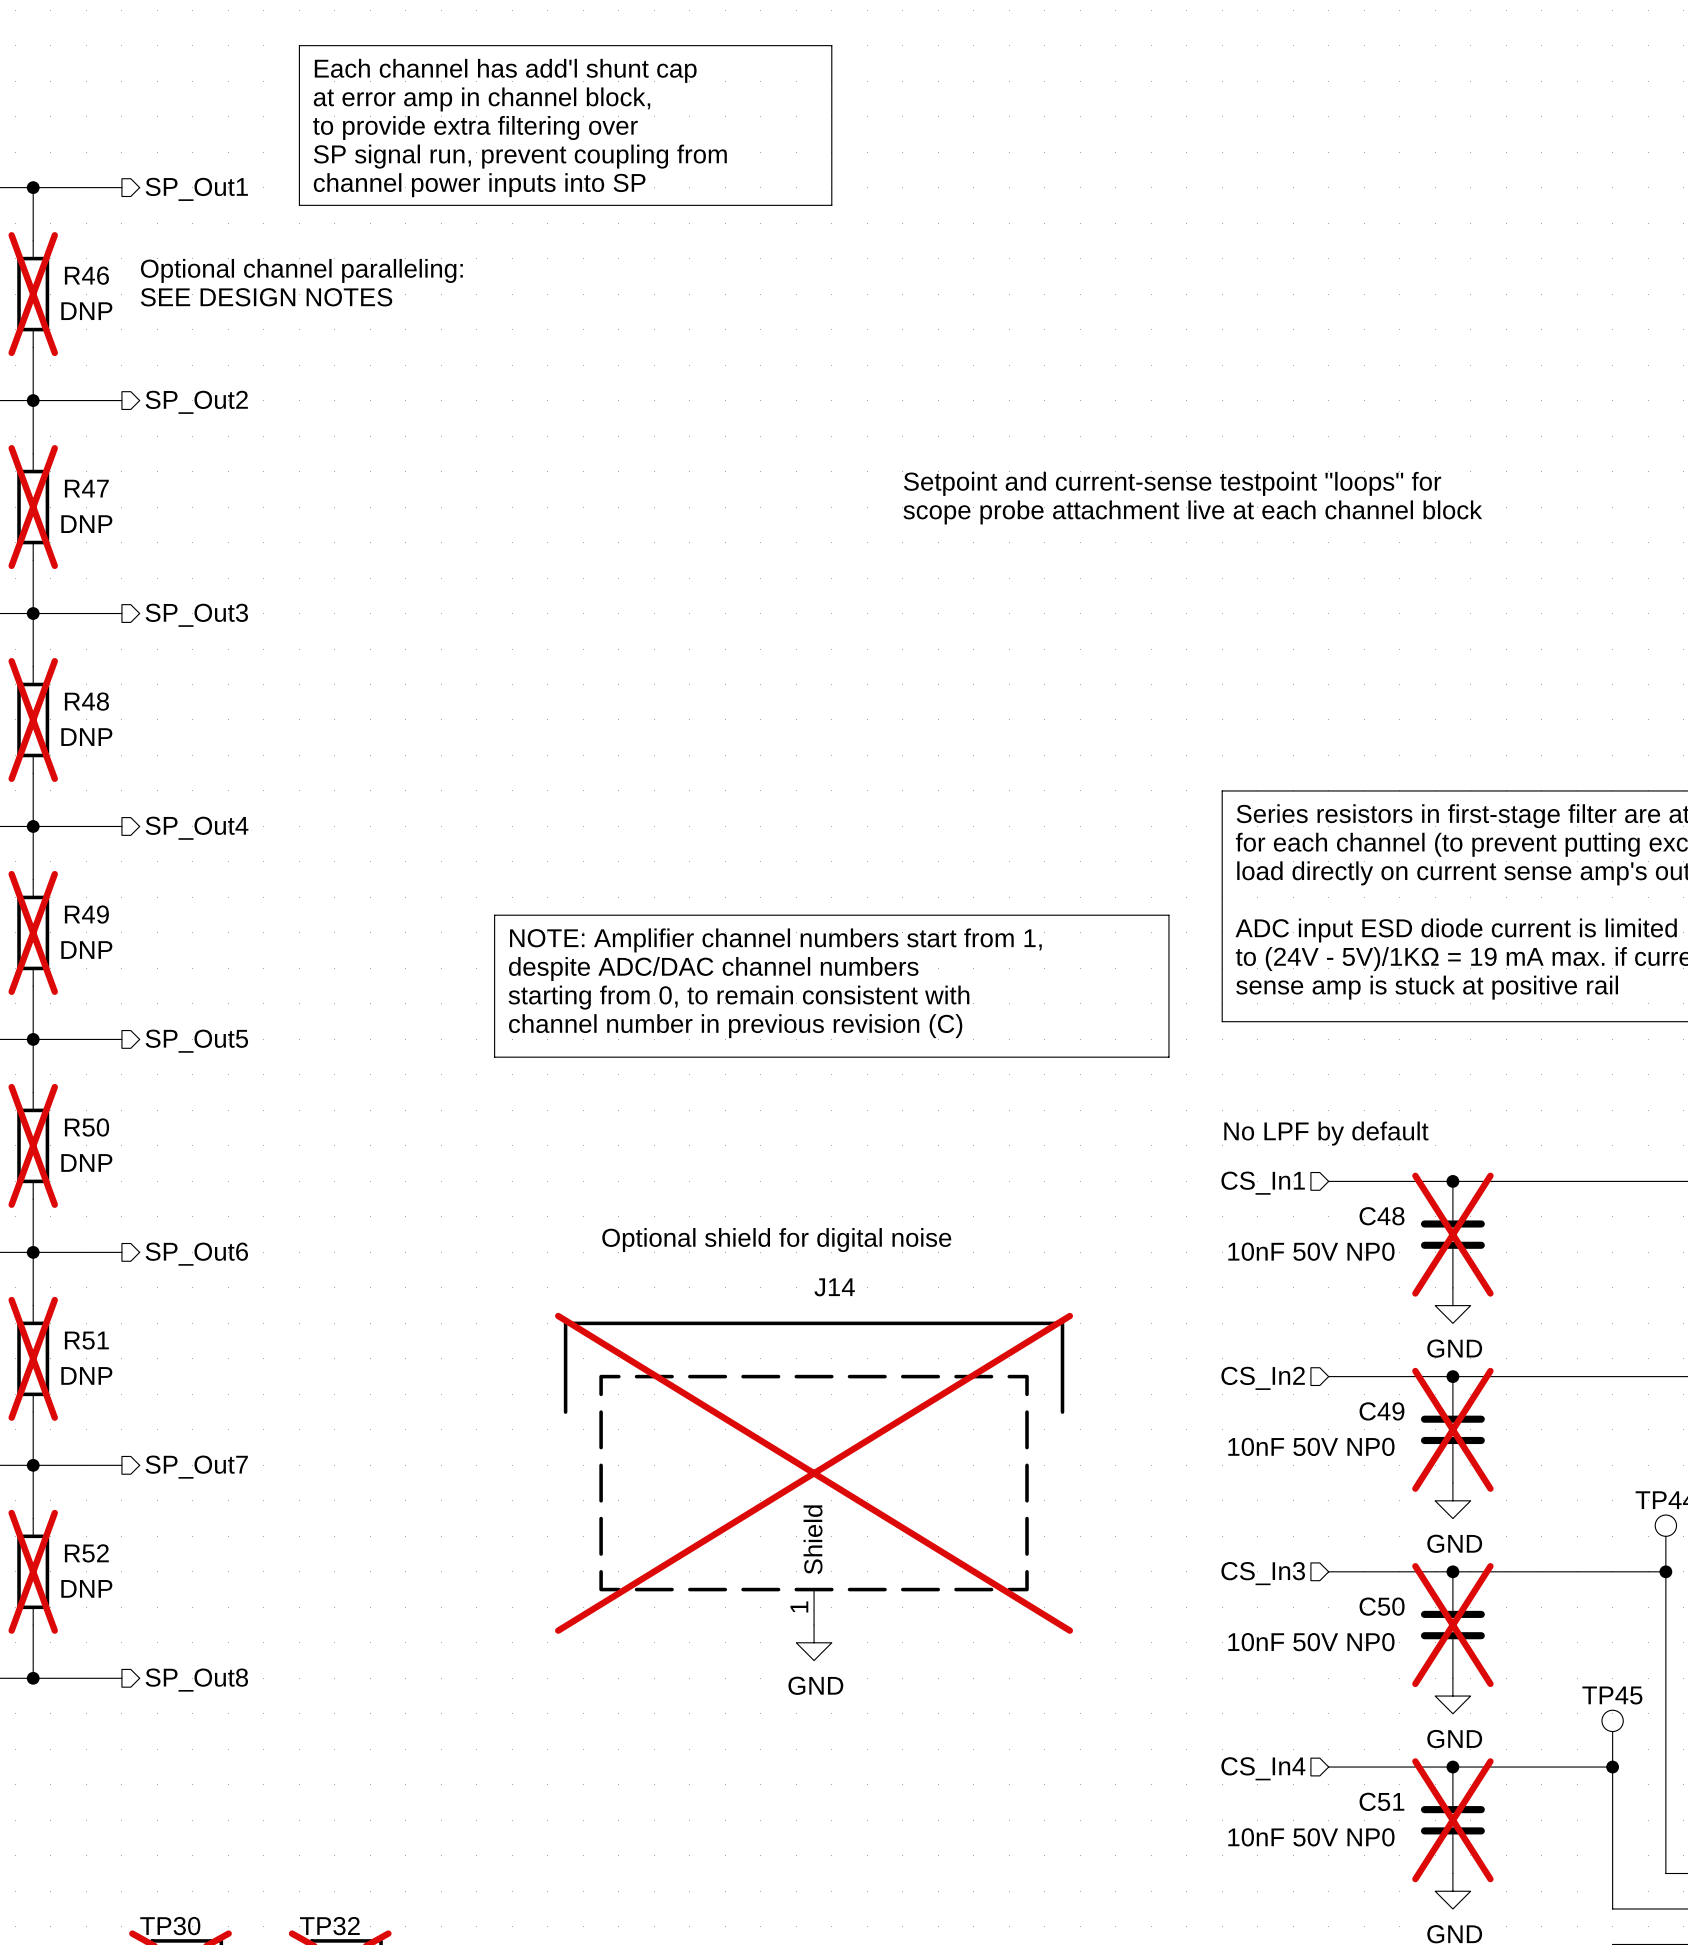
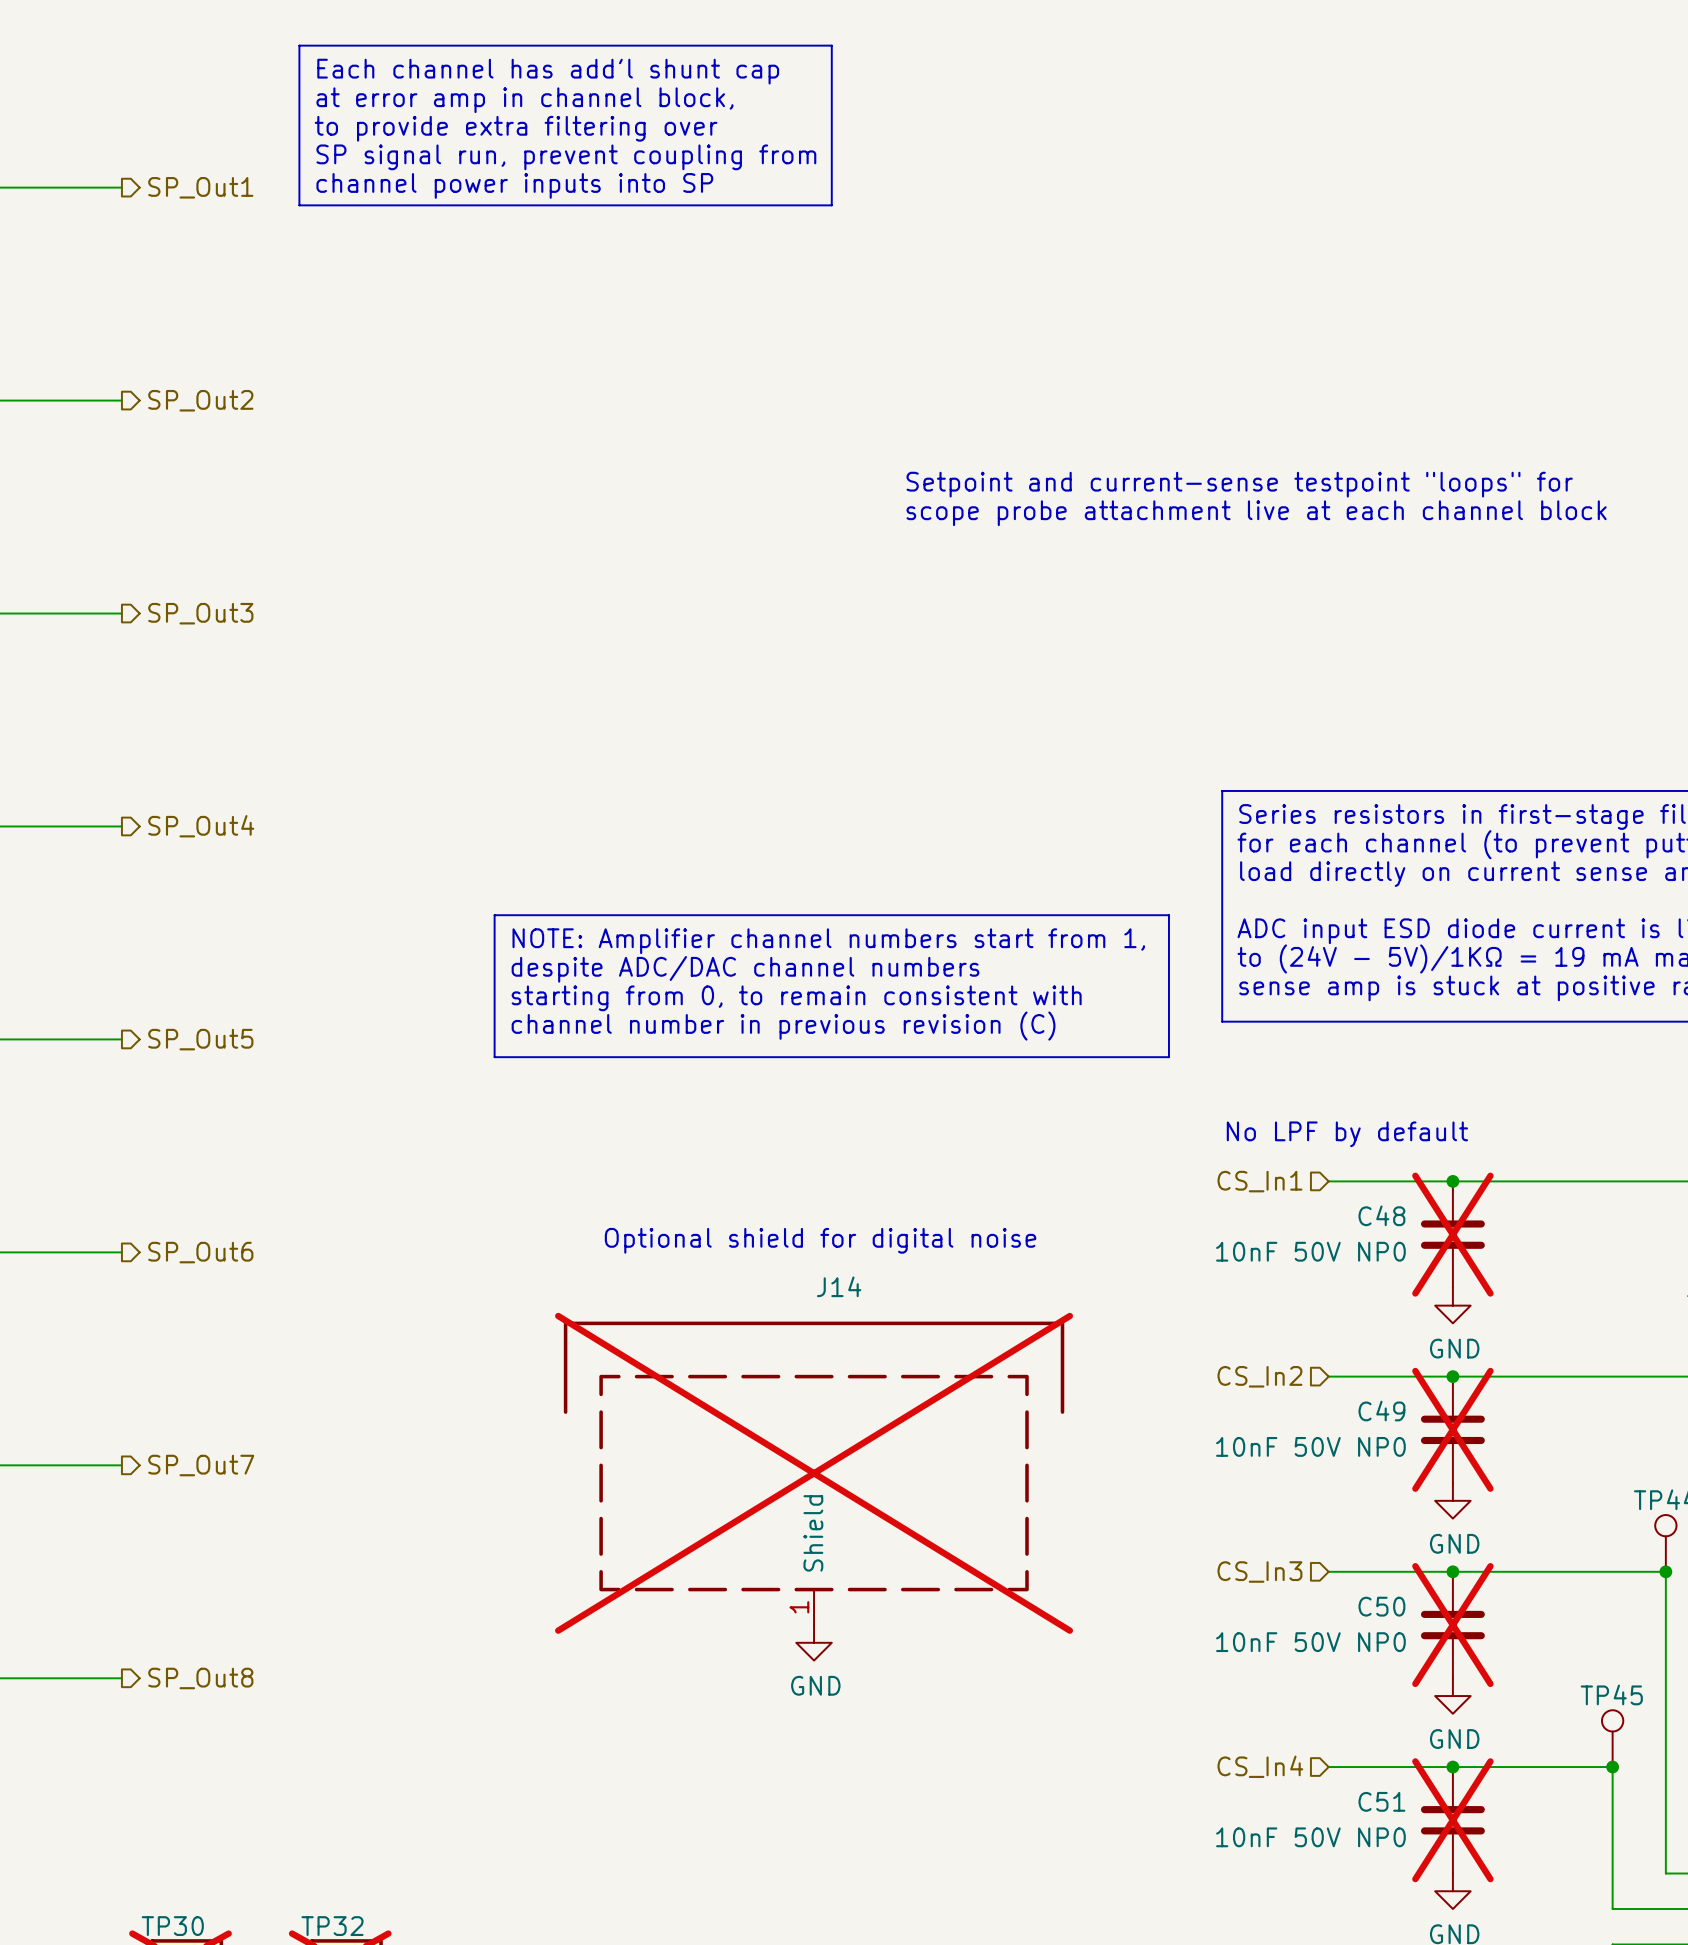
wire: (33, 187) (33, 240) -> none
junction: (33, 187) -> none
text: Optional channel paralleling: (301, 270) -> none
R46: DNP (33, 294) -> none
text: SEE DESIGN NOTES (266, 297) -> none
wire: (33, 347) (33, 453) -> none
junction: (33, 400) -> none
R47: DNP (33, 507) -> none
wire: (33, 560) (33, 666) -> none
junction: (33, 613) -> none
R48: DNP (33, 719) -> none
wire: (33, 773) (33, 879) -> none
junction: (33, 826) -> none
R49: DNP (33, 932) -> none
wire: (33, 986) (33, 1092) -> none
junction: (33, 1039) -> none
R50: DNP (33, 1145) -> none
wire: (33, 1199) (33, 1305) -> none
junction: (33, 1252) -> none
R51: DNP (33, 1358) -> none
wire: (33, 1412) (33, 1518) -> none
junction: (33, 1465) -> none
R52: DNP (33, 1571) -> none
wire: (33, 1625) (33, 1678) -> none
junction: (33, 1678) -> none

